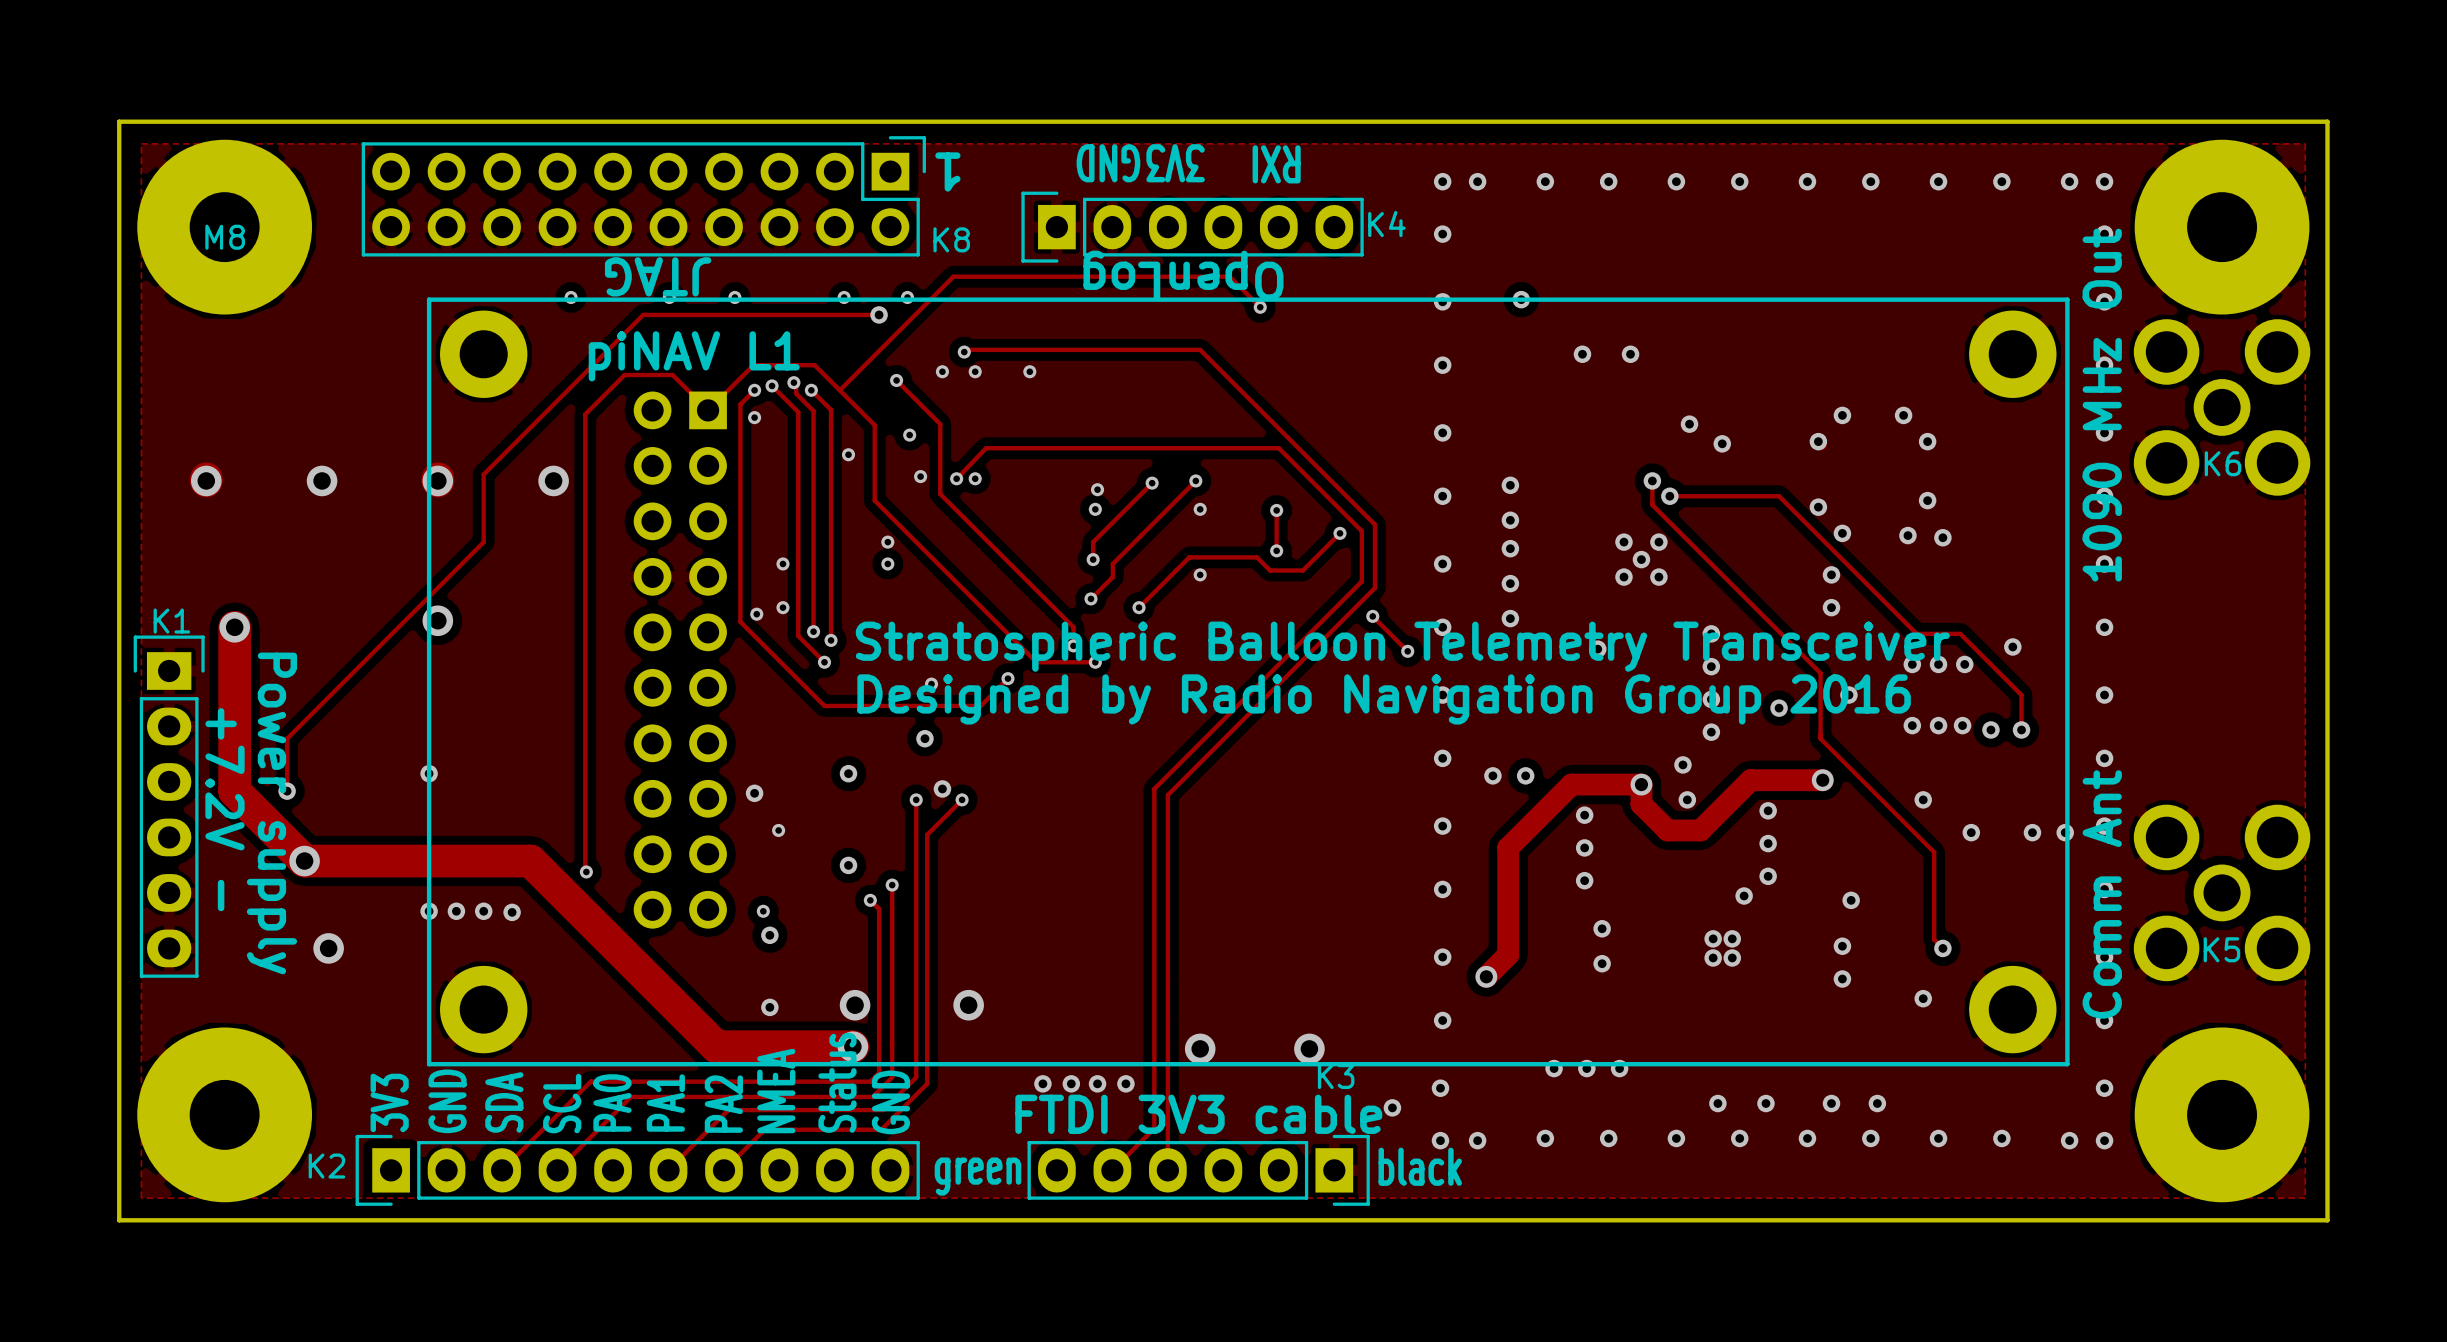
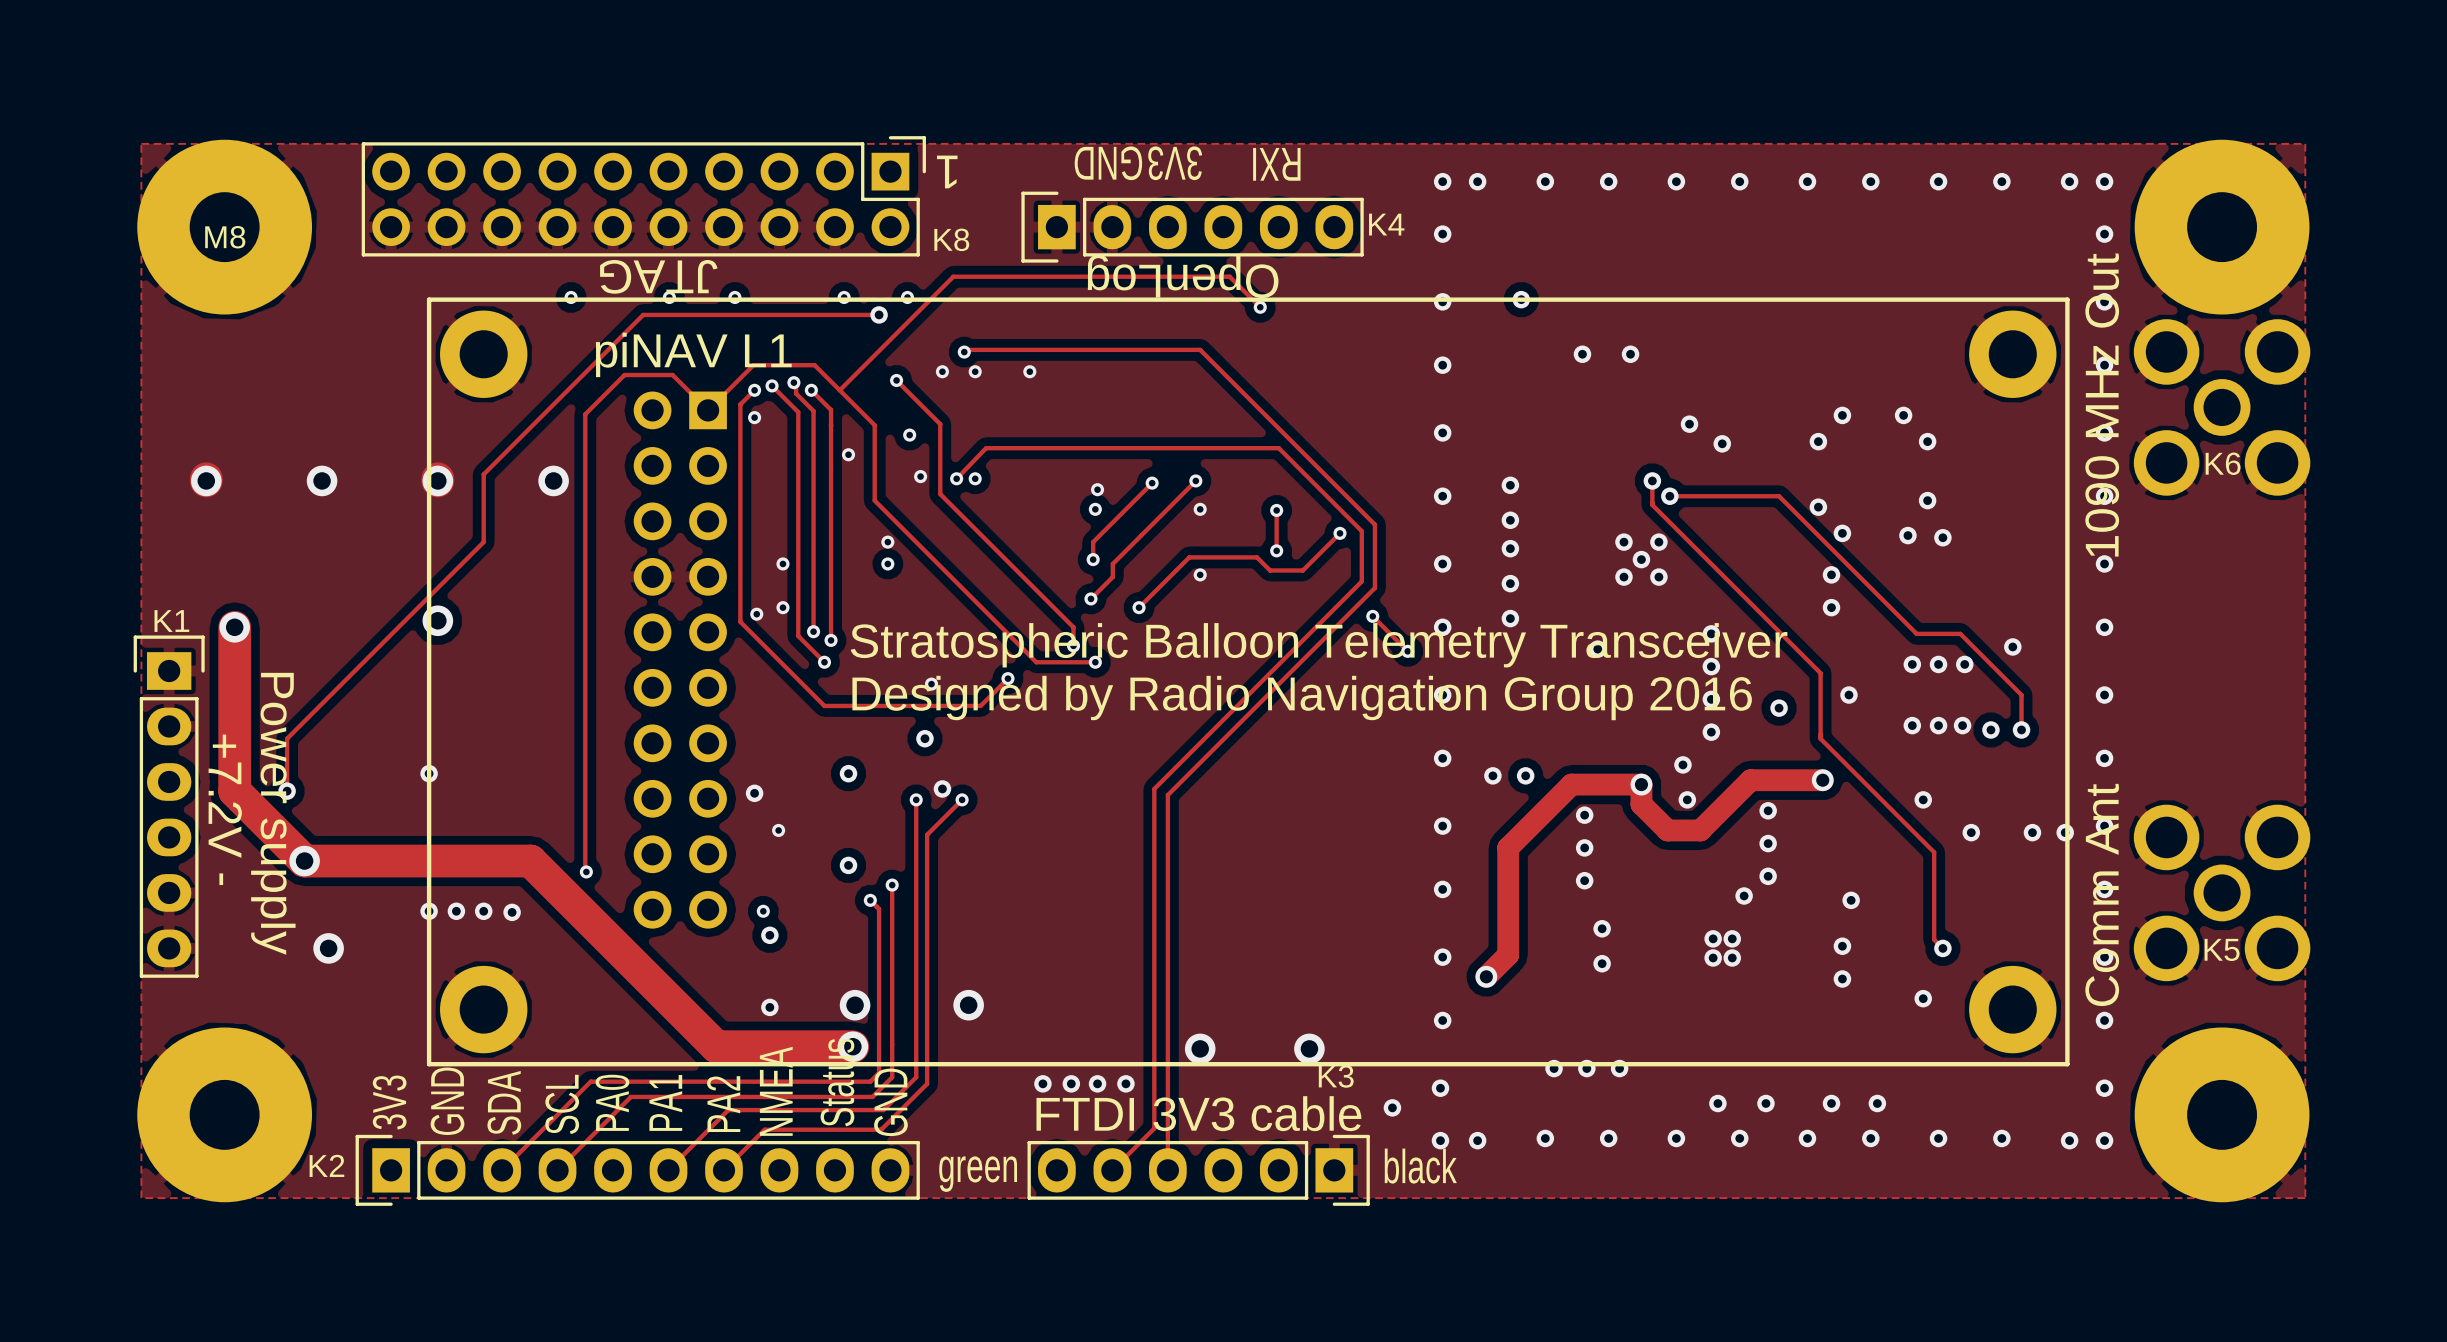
board edge: (119, 121) (119, 1220) (2327, 1220) (2327, 121) (119, 121) -> none

